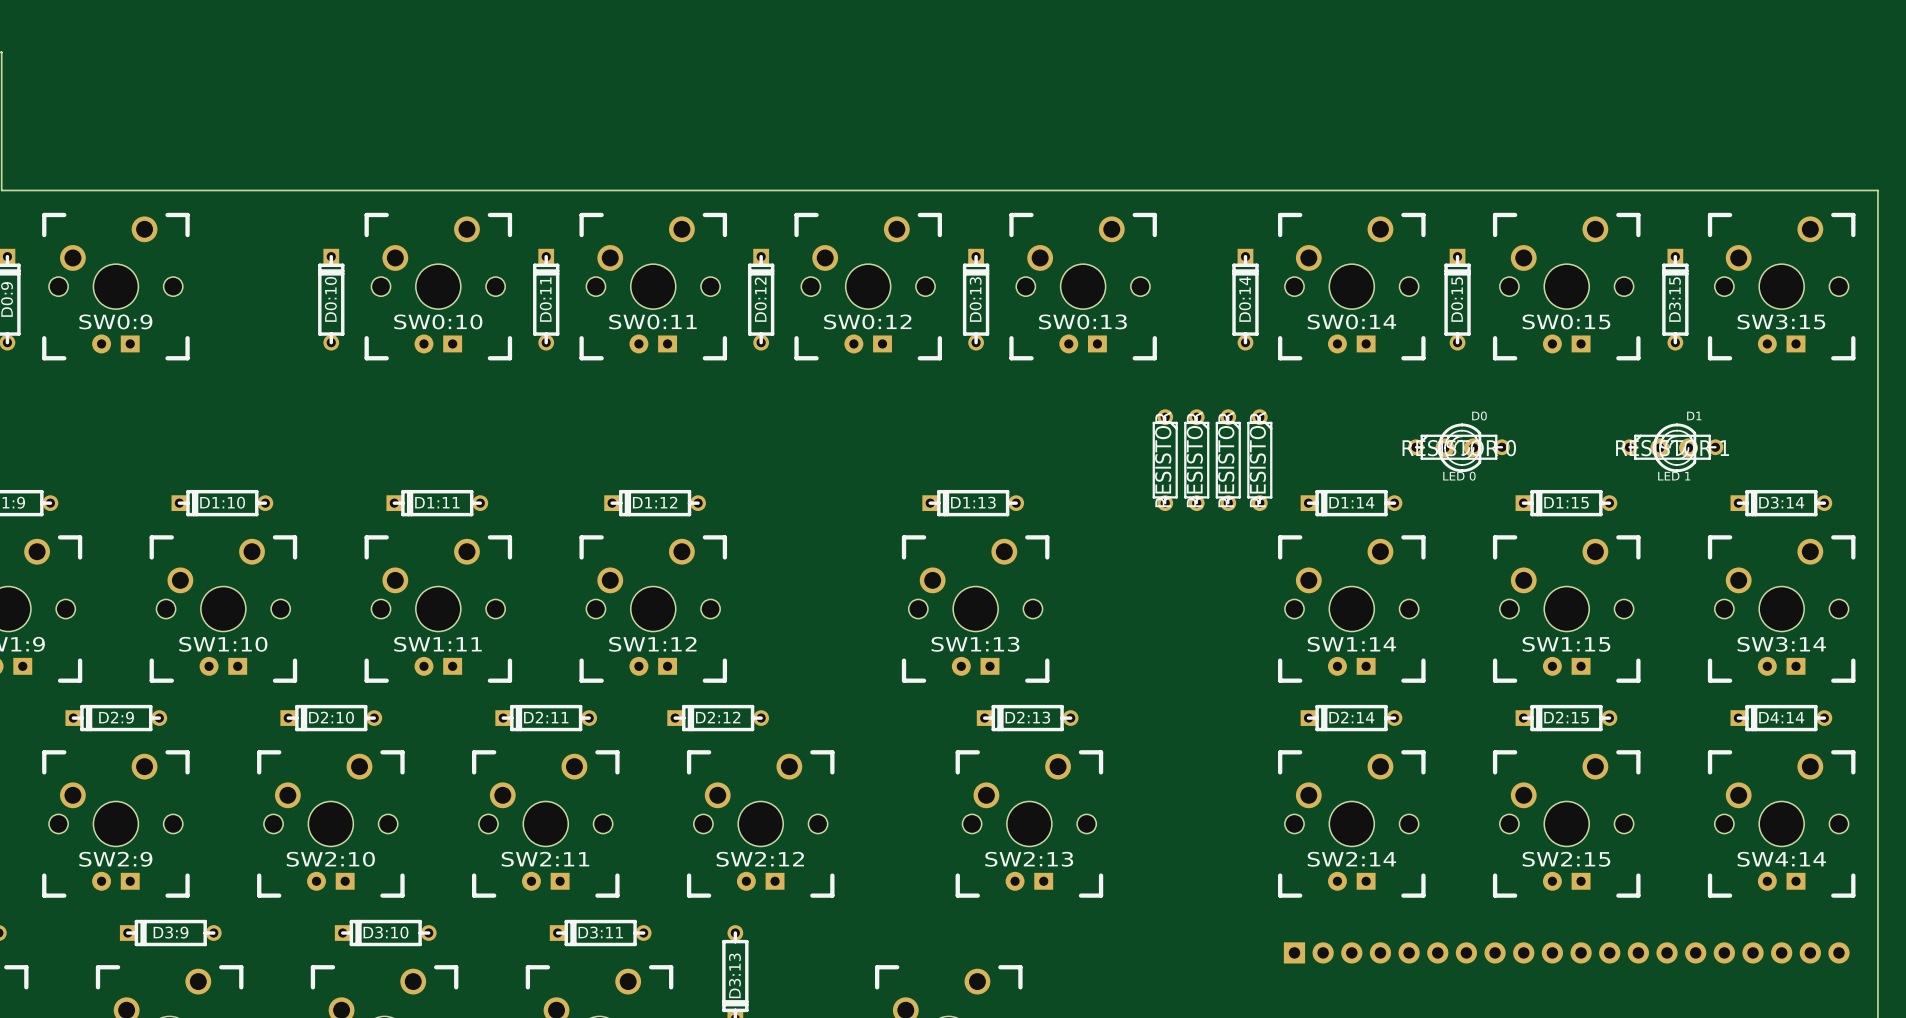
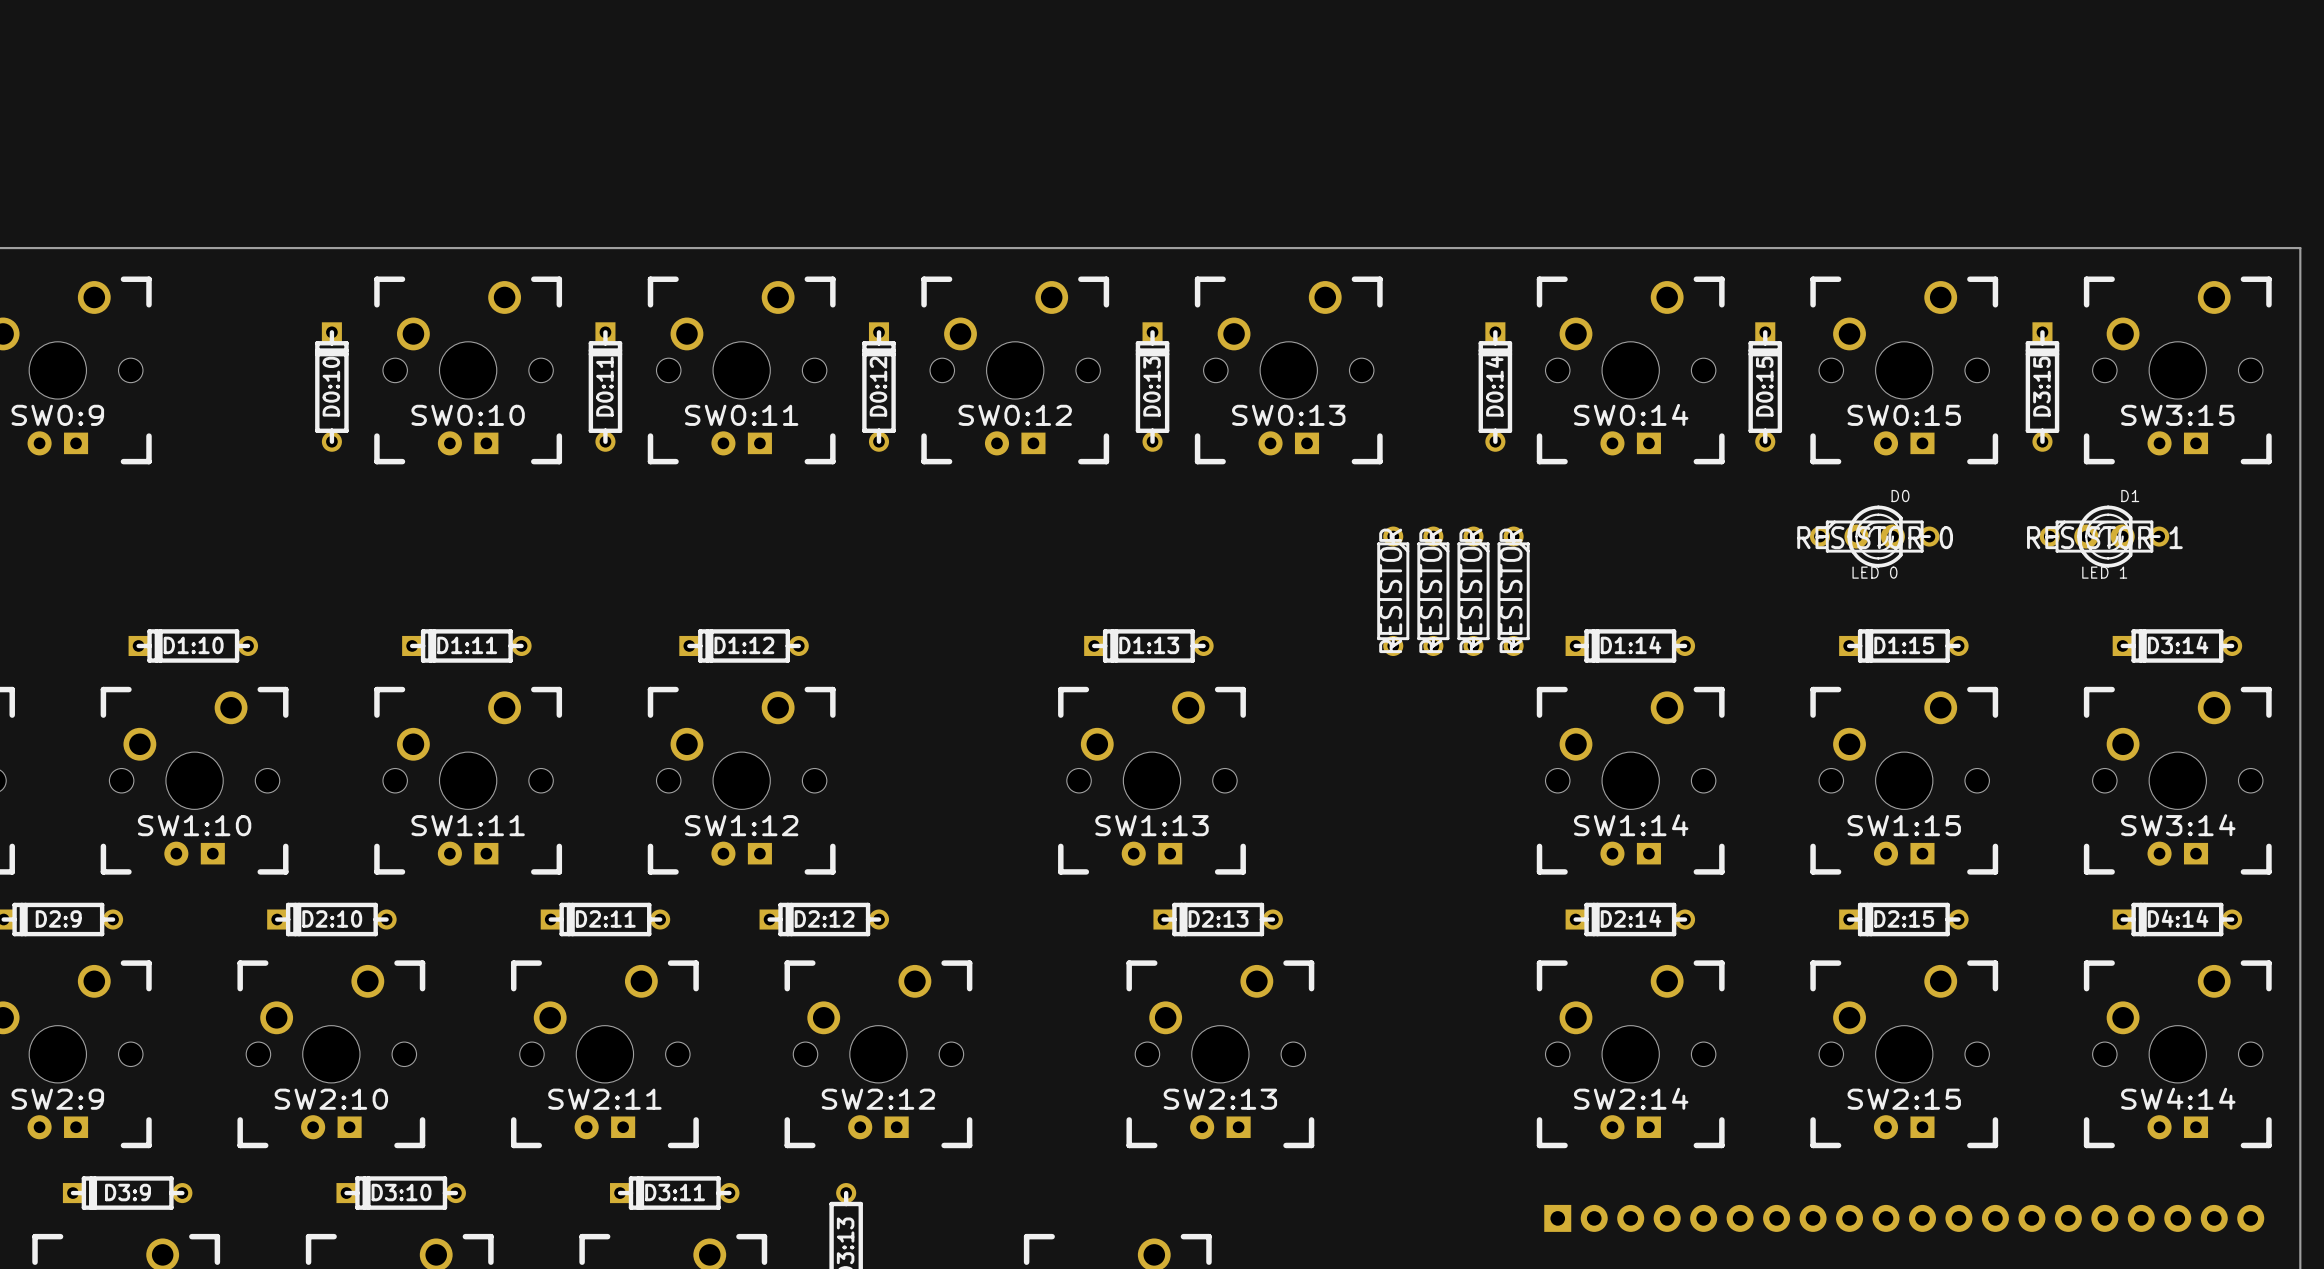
part position: (1458, 447) -> (1874, 536)
D0 position: (1459, 447) -> (1874, 536)
part position: (1672, 447) -> (2104, 536)
D1 position: (1674, 447) -> (2104, 536)

